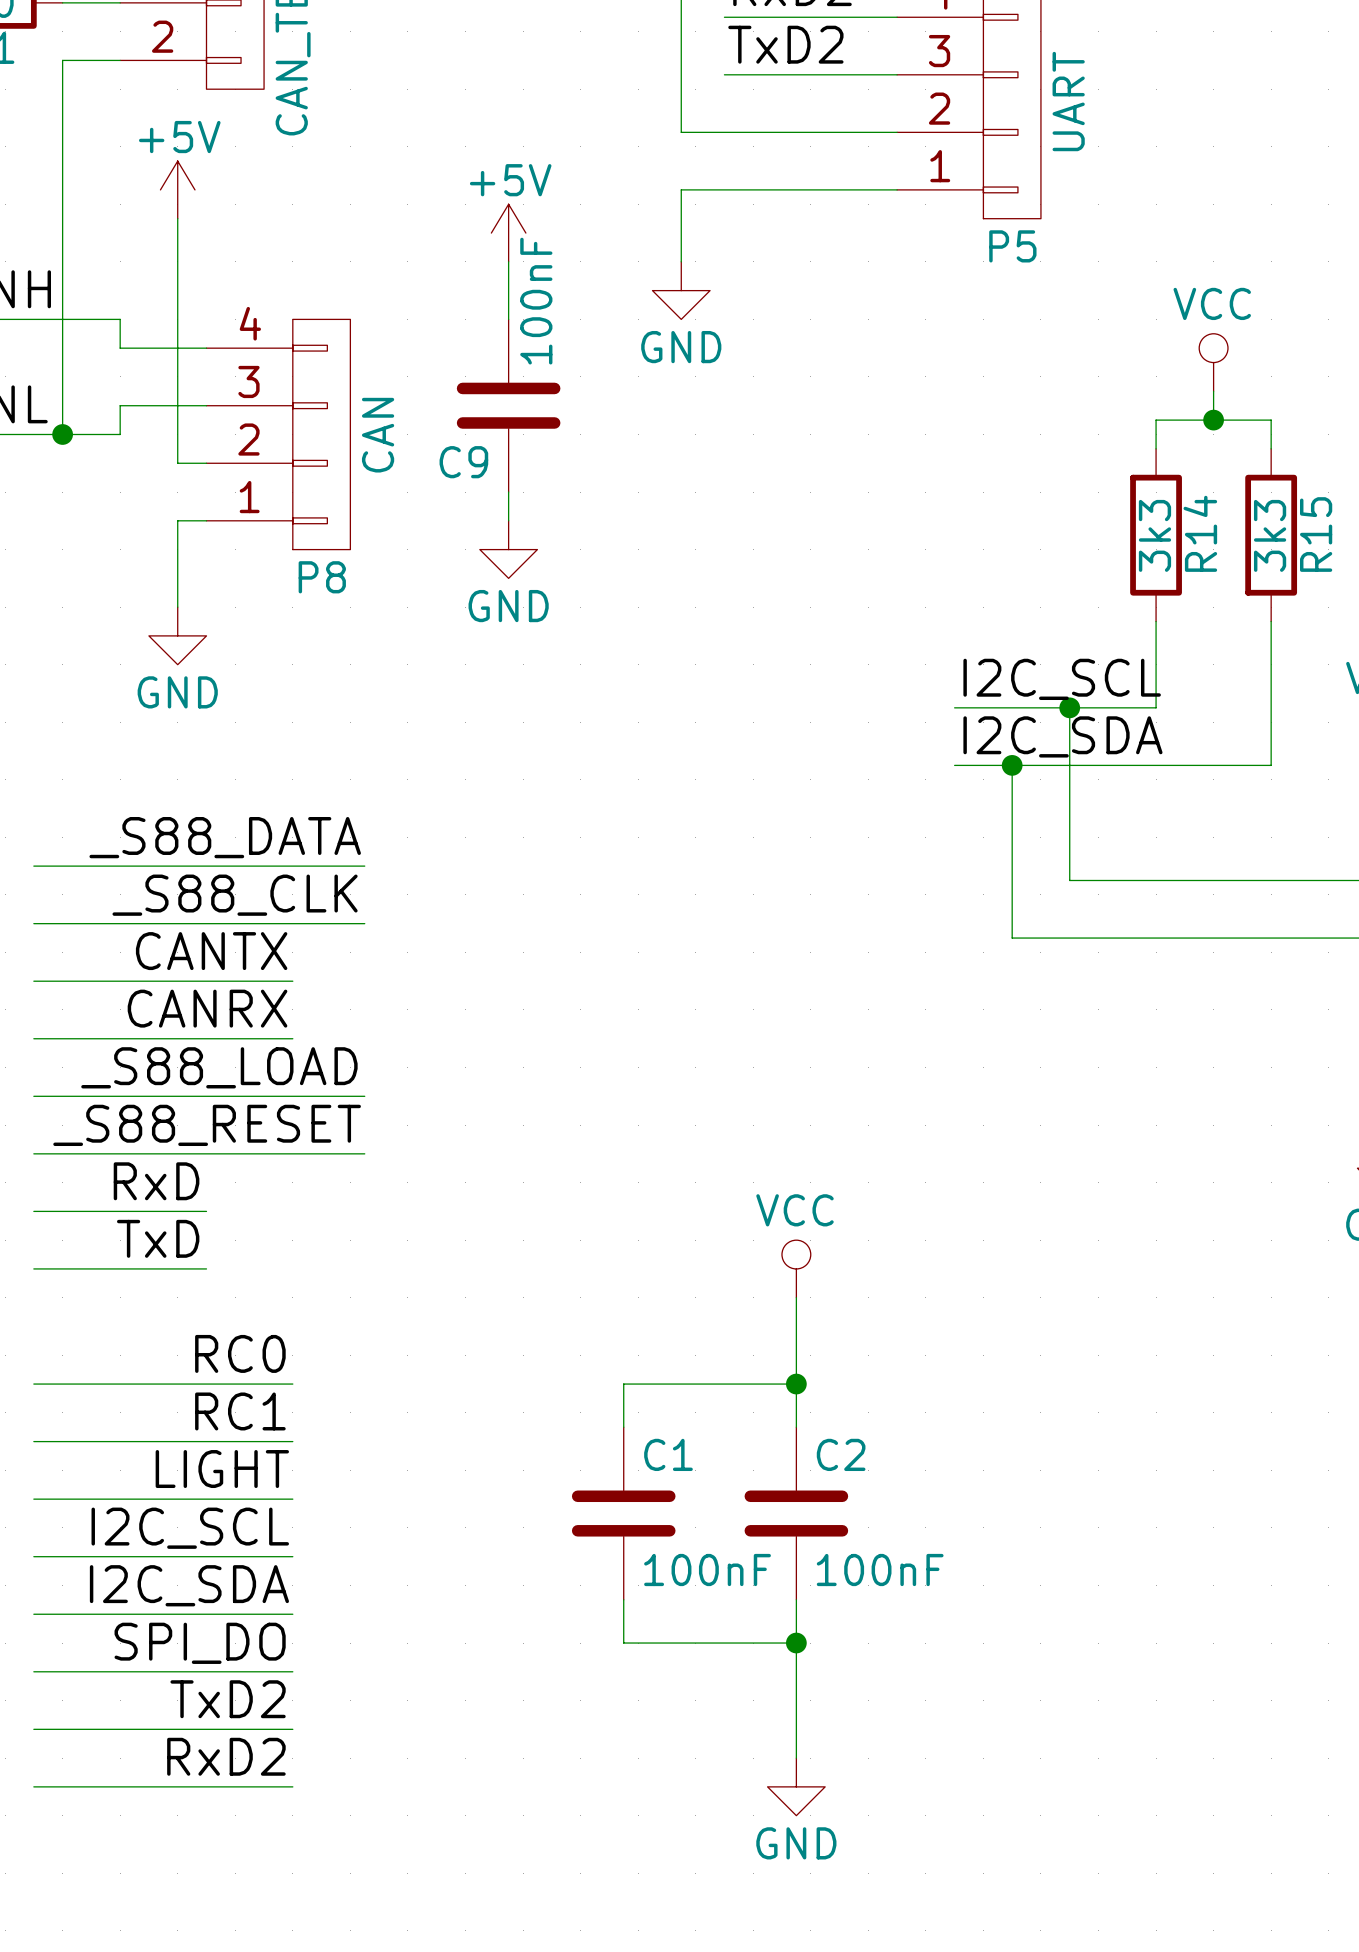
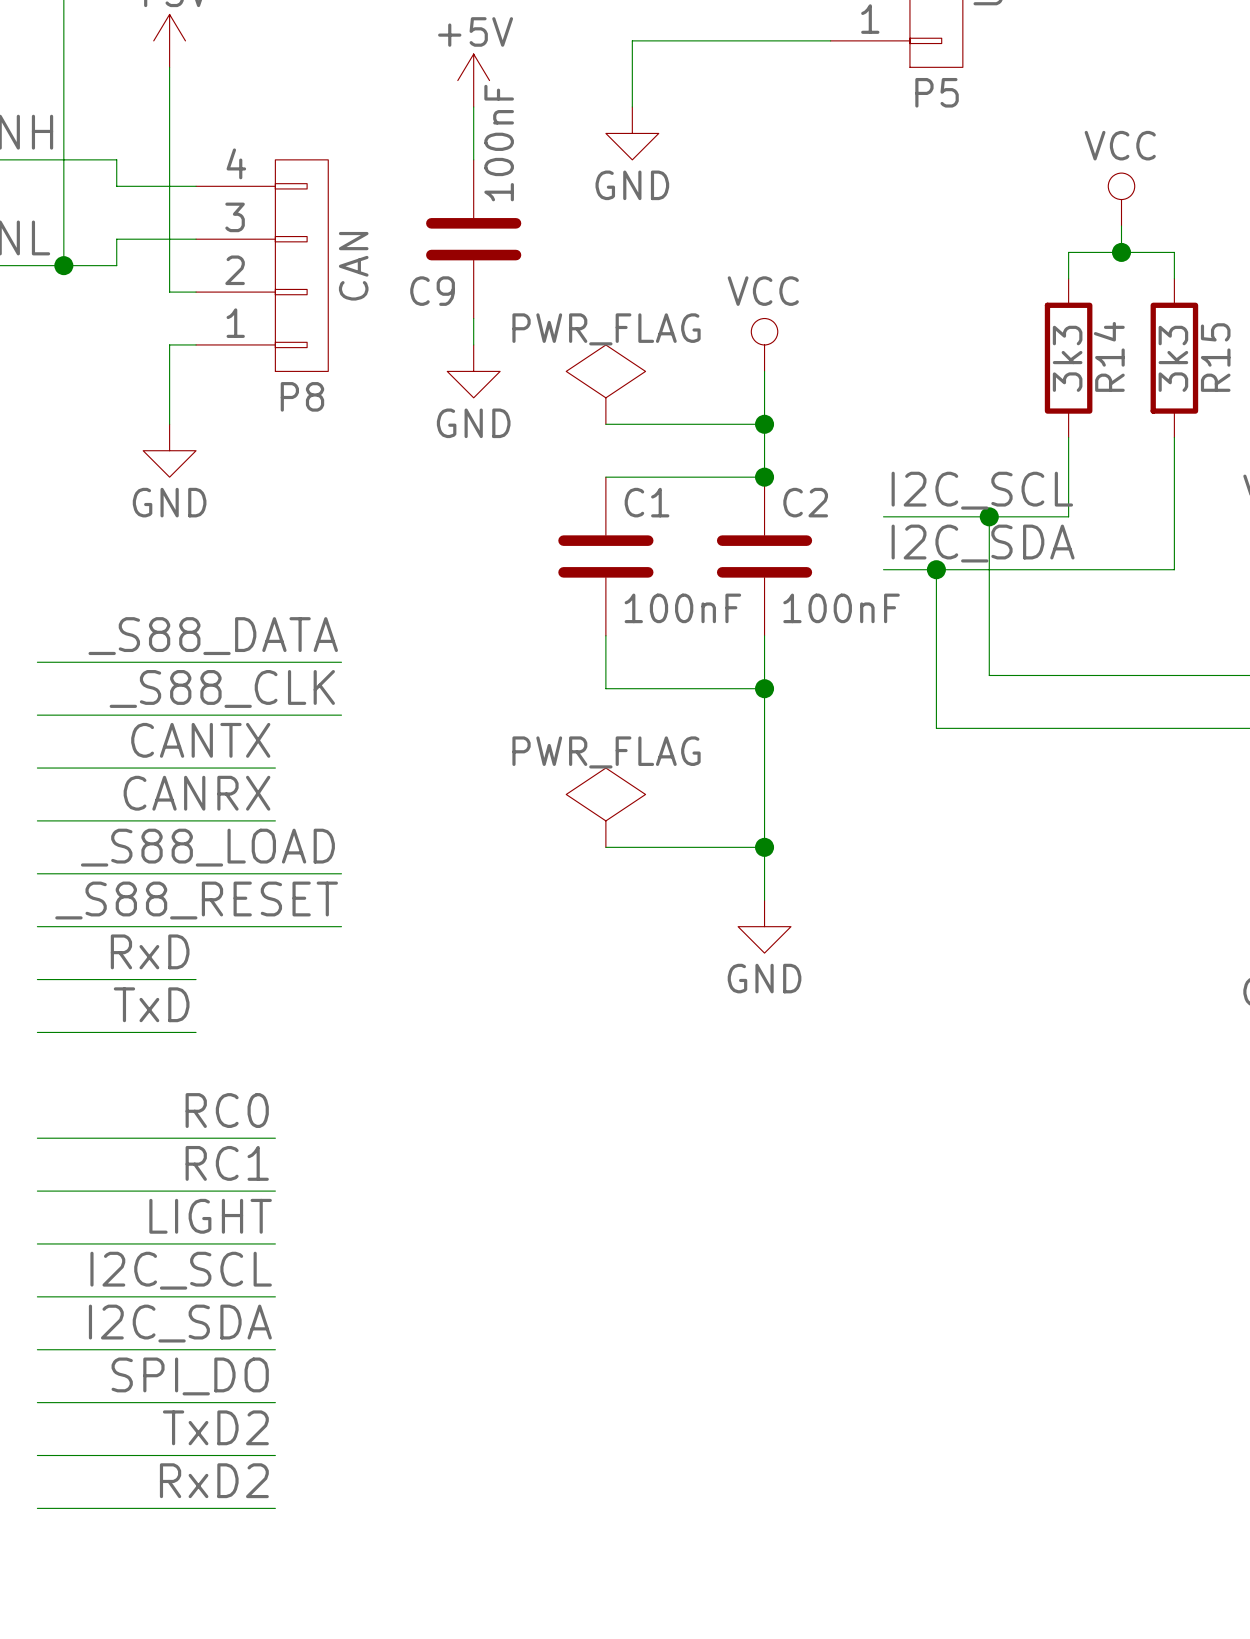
power symbol: none -> VCC (764, 344)
wire: none -> (764, 371) (764, 477) (605, 477)
power symbol: none -> PWR_FLAG (605, 384)
wire: none -> (605, 424) (764, 424)
junction: none -> (764, 424)
junction: none -> (764, 477)
wire: none -> (605, 635) (605, 688) (764, 688)
wire: none -> (764, 635) (764, 900)
junction: none -> (764, 688)
power symbol: none -> PWR_FLAG (605, 807)
wire: none -> (605, 847) (764, 847)
junction: none -> (764, 847)
power symbol: none -> GND (764, 926)
power symbol: VCC (796, 1268) -> none
wire: (796, 1297) (796, 1427) -> none
wire: (796, 1384) (623, 1384) (623, 1427) -> none
junction: (796, 1384) -> none
C1 position: (623, 1513) -> (605, 556)
C2 position: (796, 1513) -> (764, 556)
wire: (623, 1599) (623, 1643) (796, 1643) -> none
wire: (796, 1599) (796, 1758) -> none
junction: (796, 1643) -> none
power symbol: GND (796, 1786) -> none

